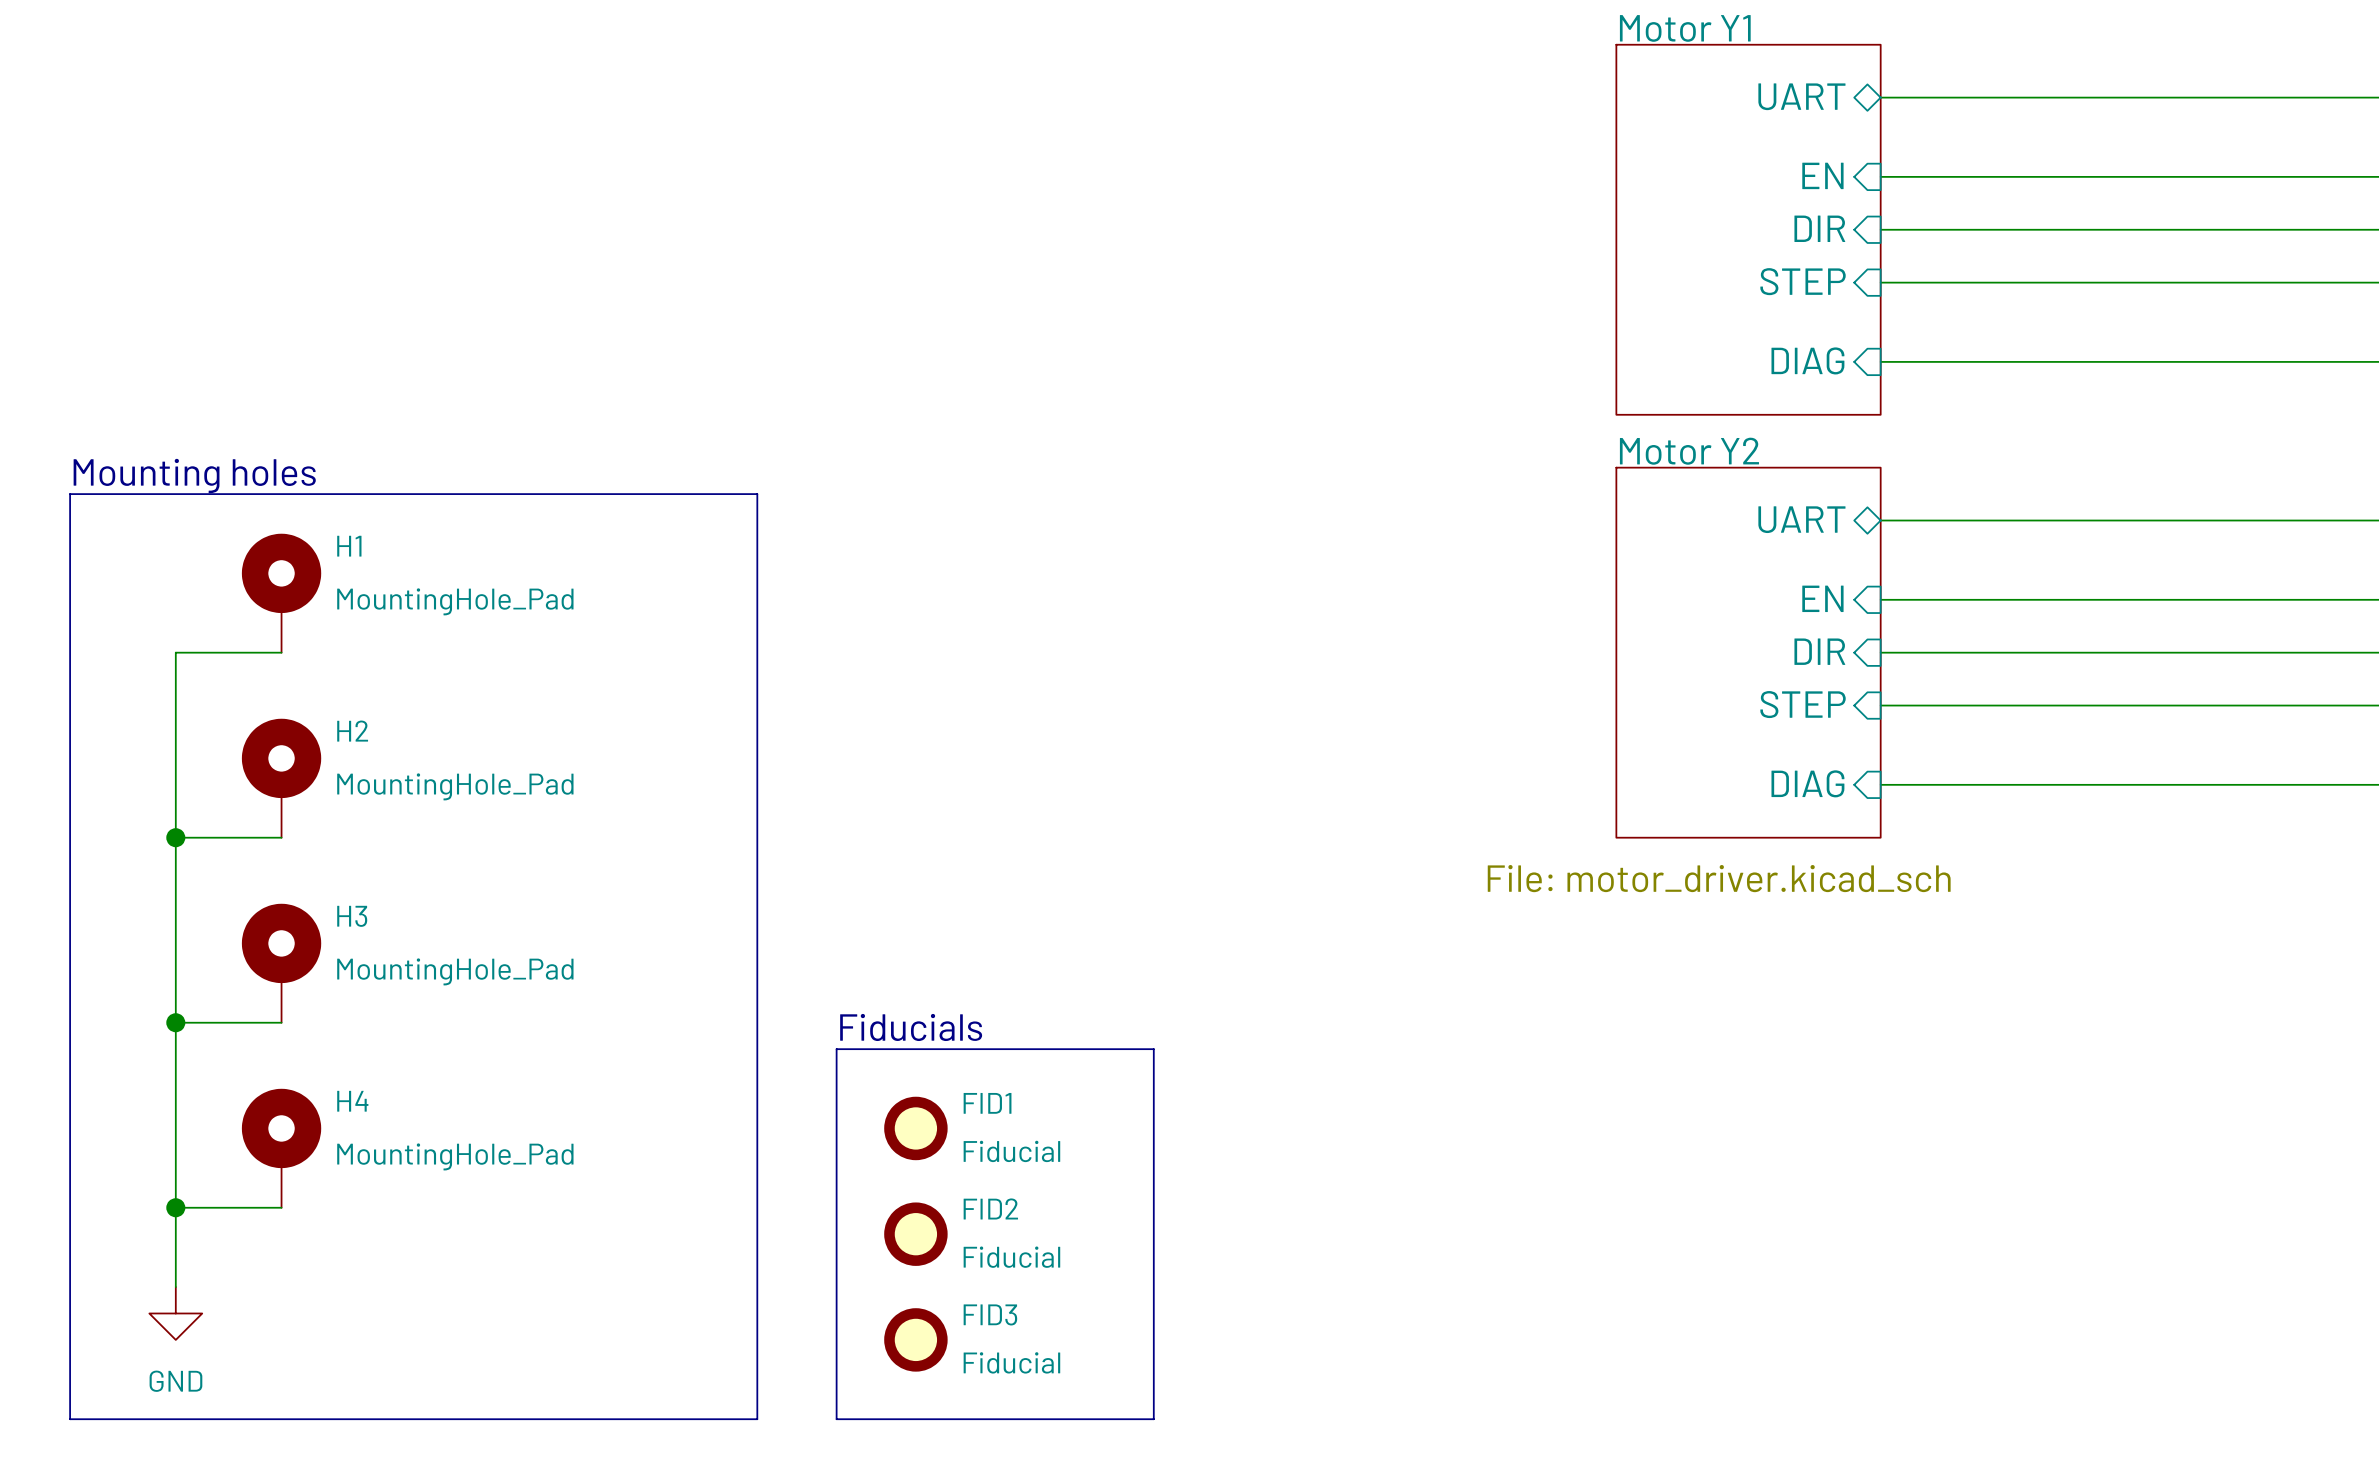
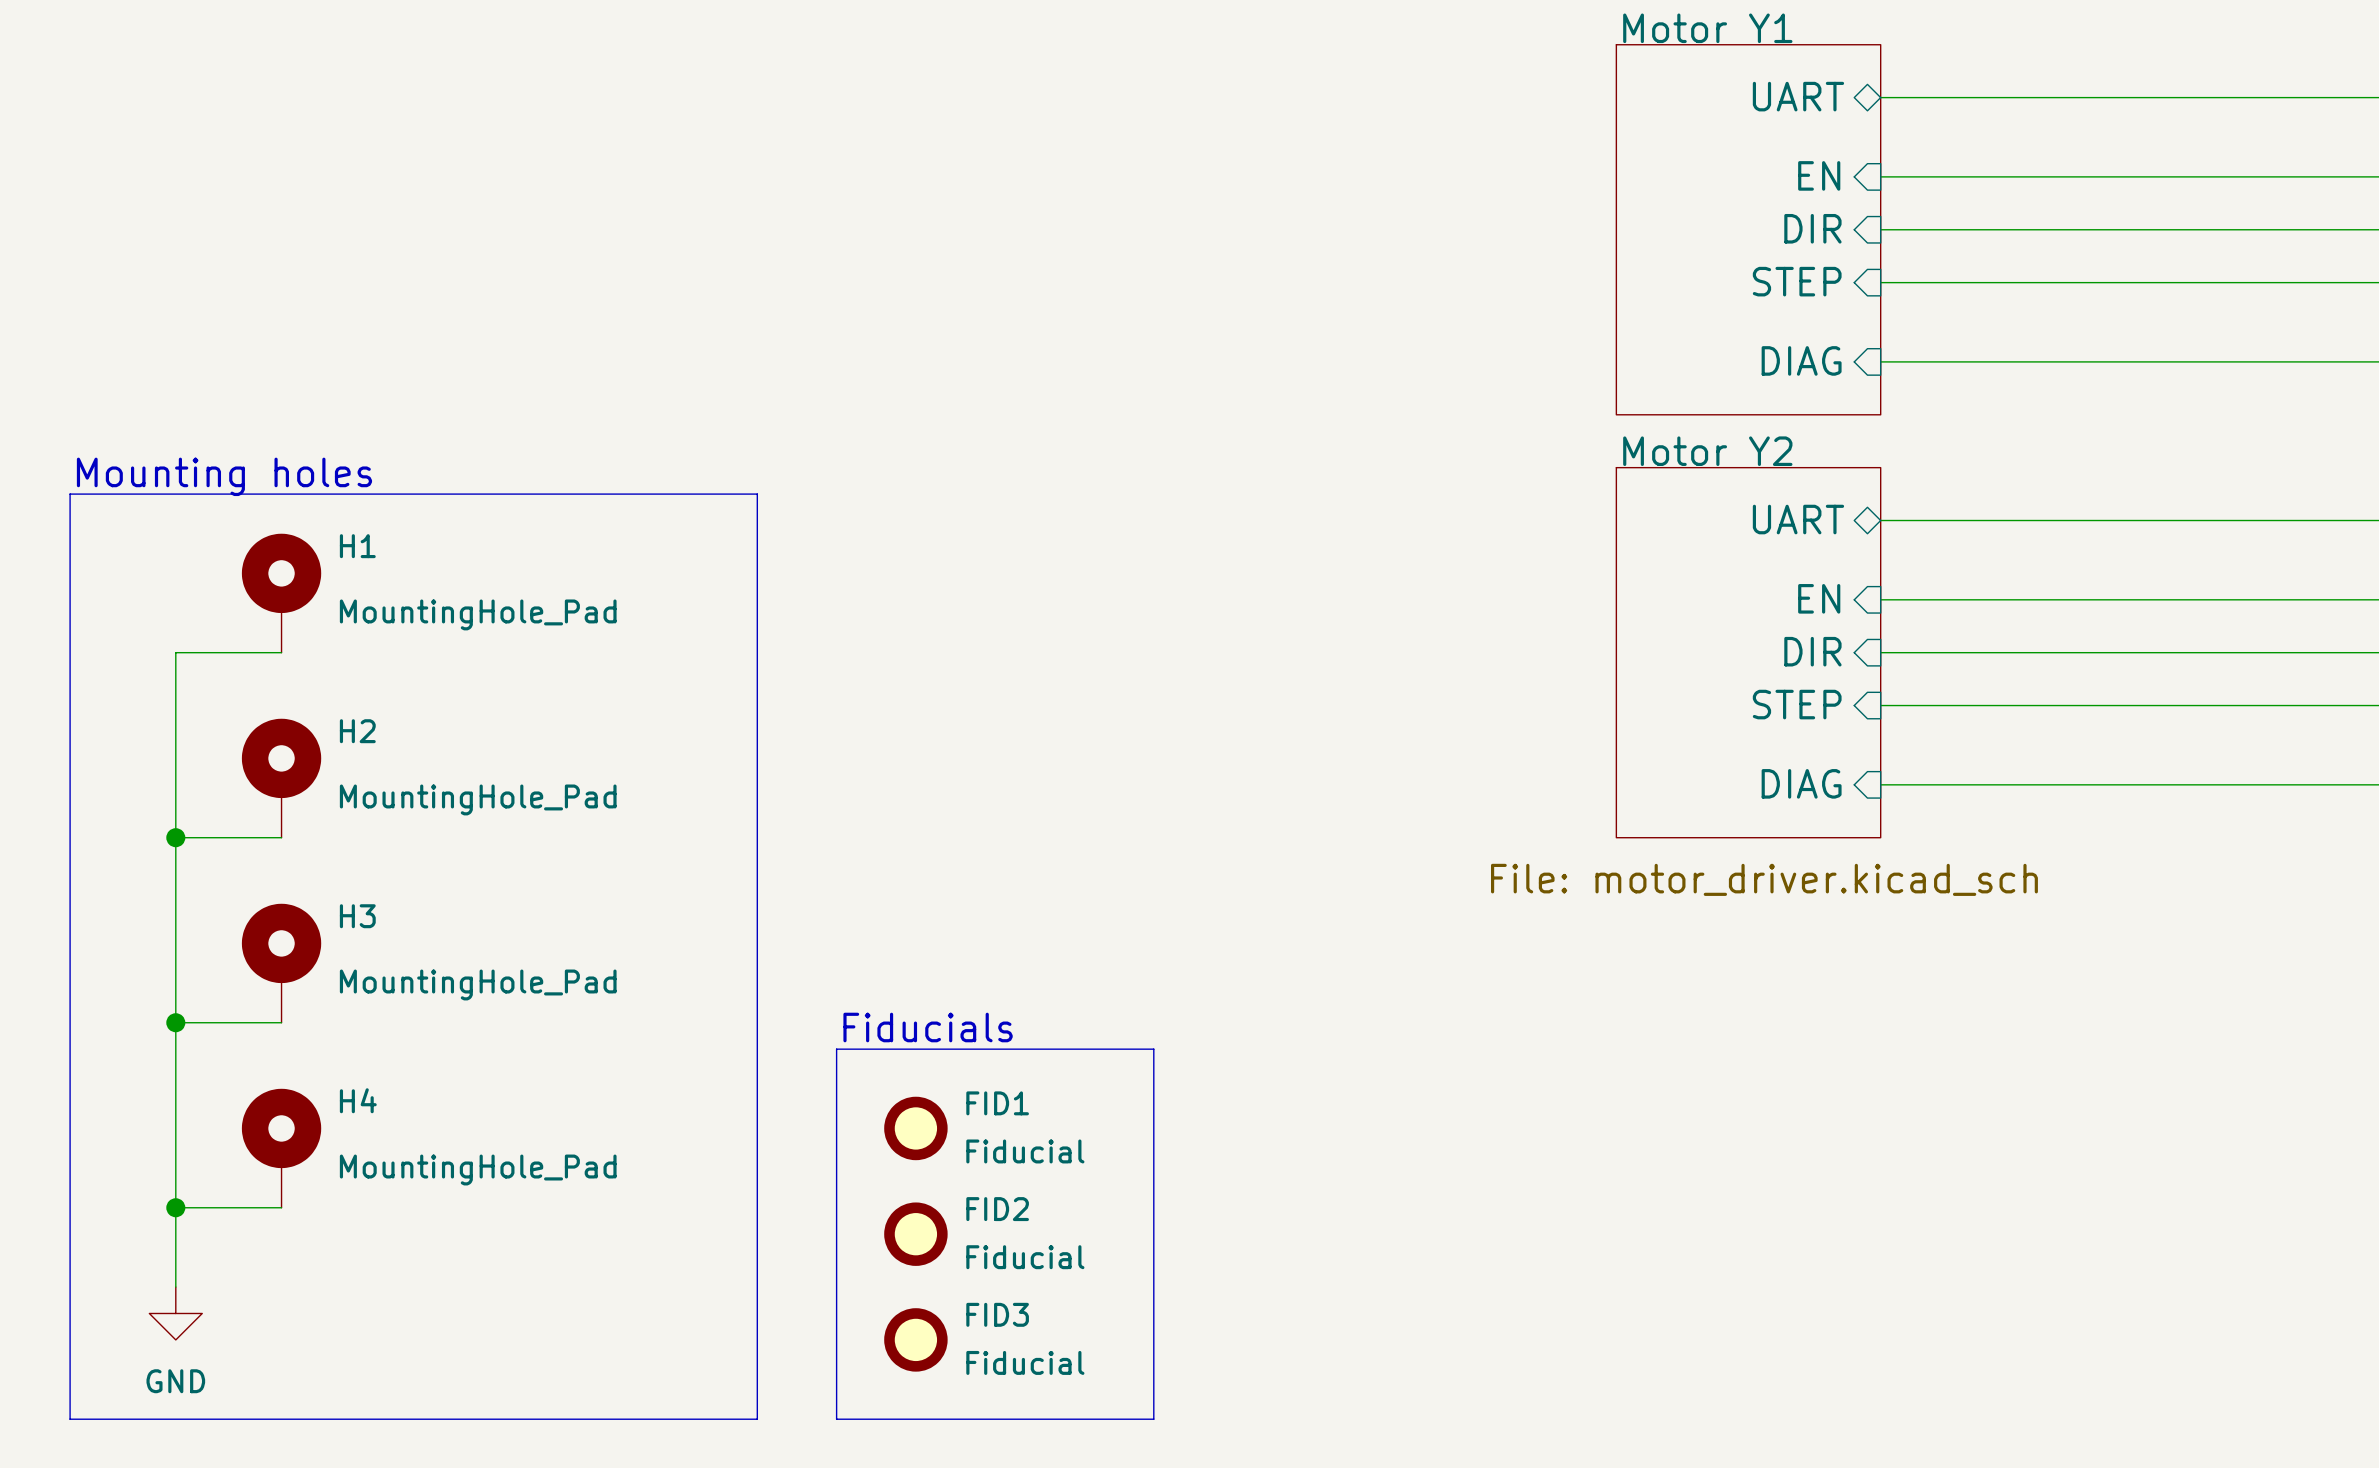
H1 value position: MountingHole_Pad (455, 601) -> MountingHole_Pad (478, 614)
H2 value position: MountingHole_Pad (455, 786) -> MountingHole_Pad (478, 799)
H3 value position: MountingHole_Pad (455, 971) -> MountingHole_Pad (478, 984)
H4 value position: MountingHole_Pad (455, 1156) -> MountingHole_Pad (478, 1170)

